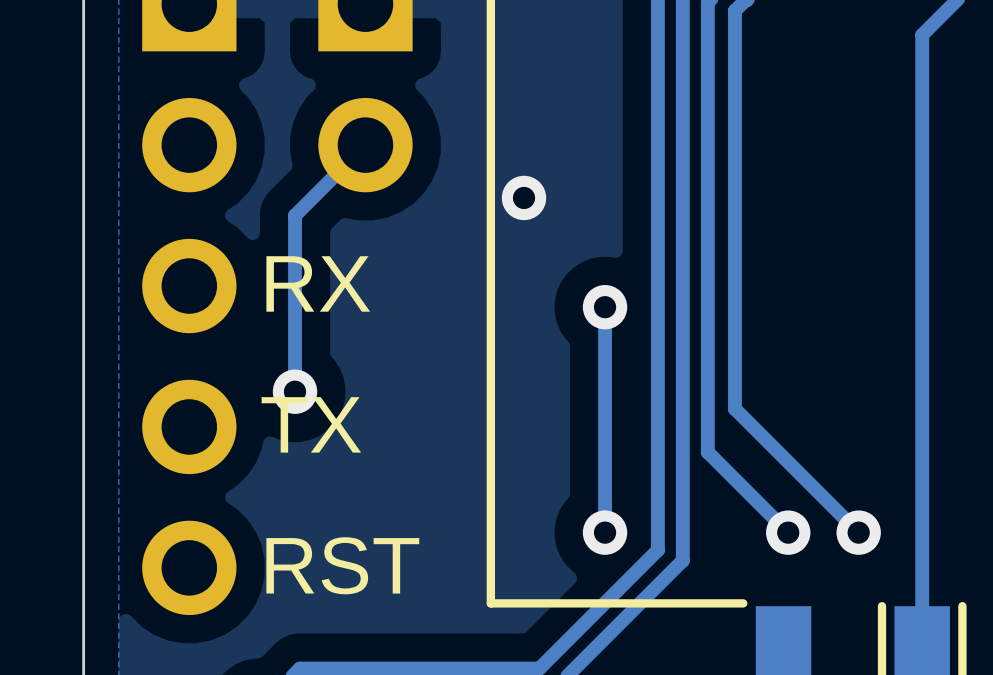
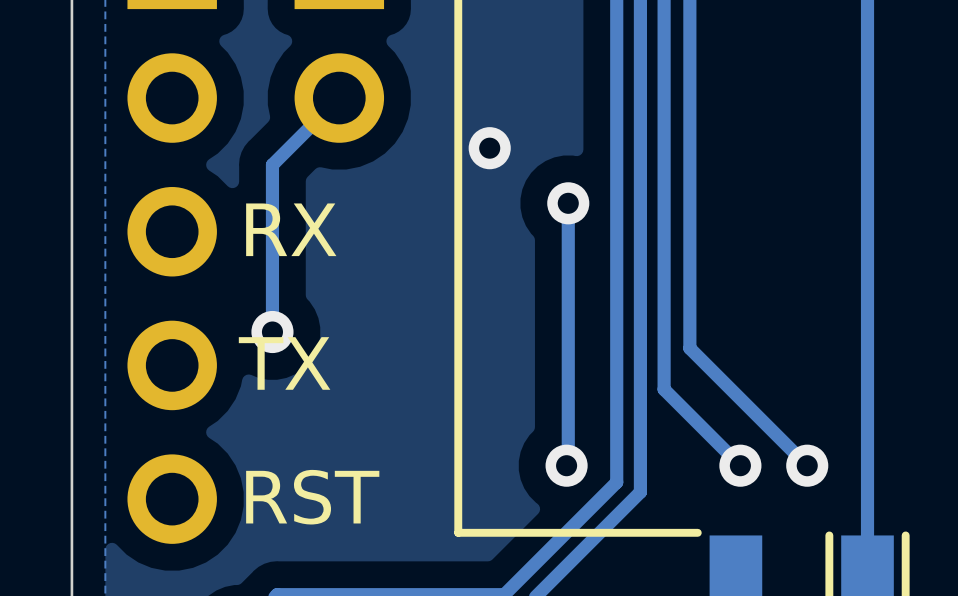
track: (605, 307) (605, 532) -> (568, 203) (568, 464) (566, 465)
via position: (605, 307) -> (568, 203)

